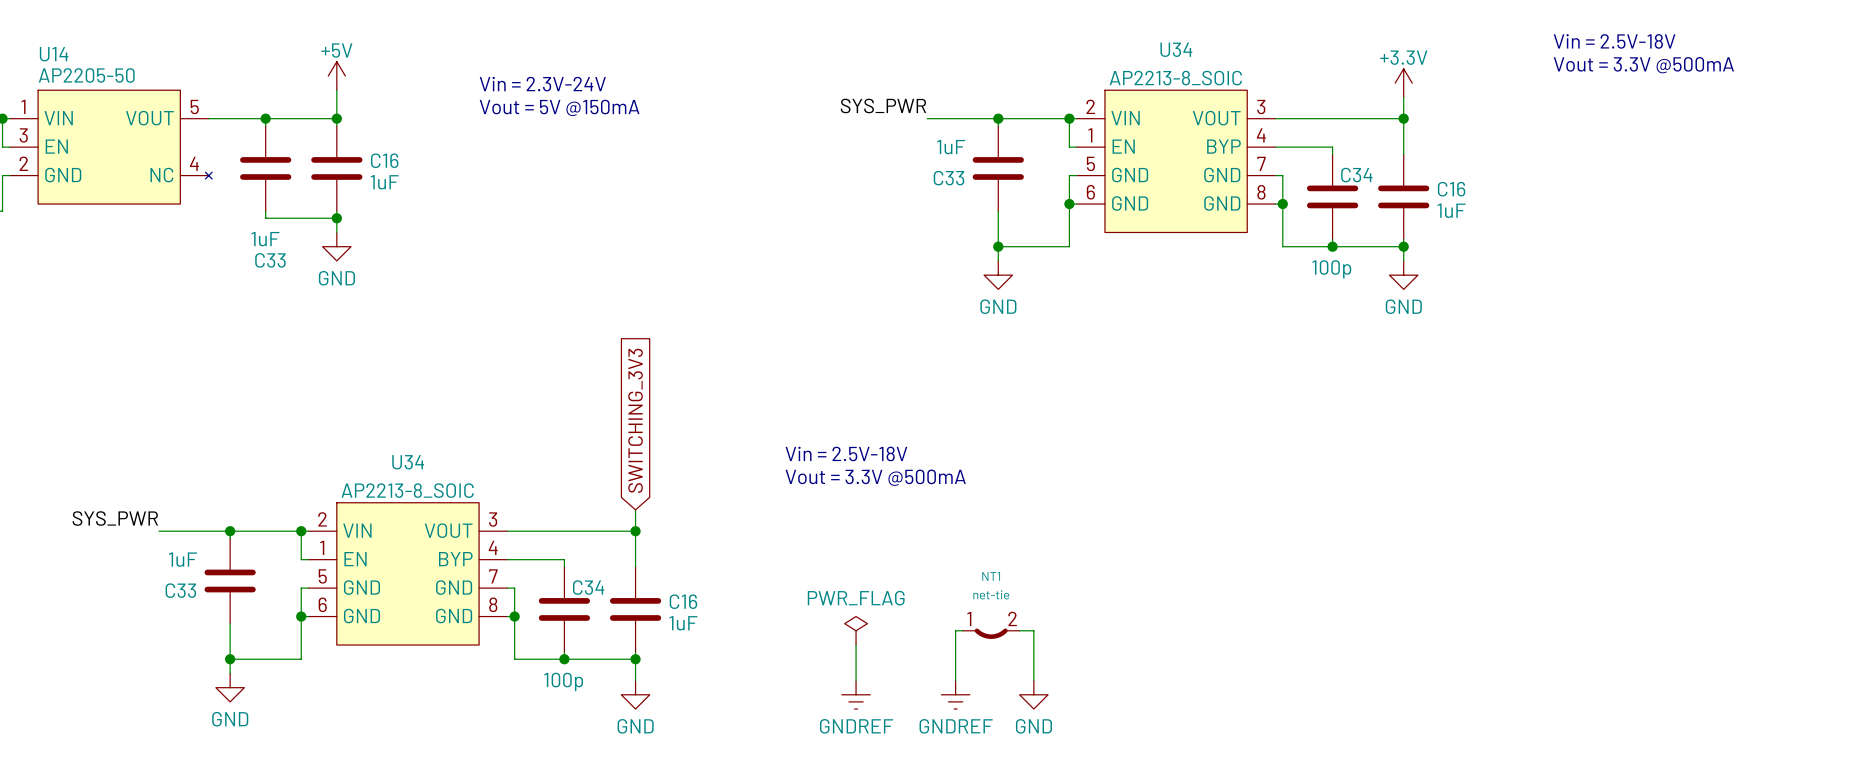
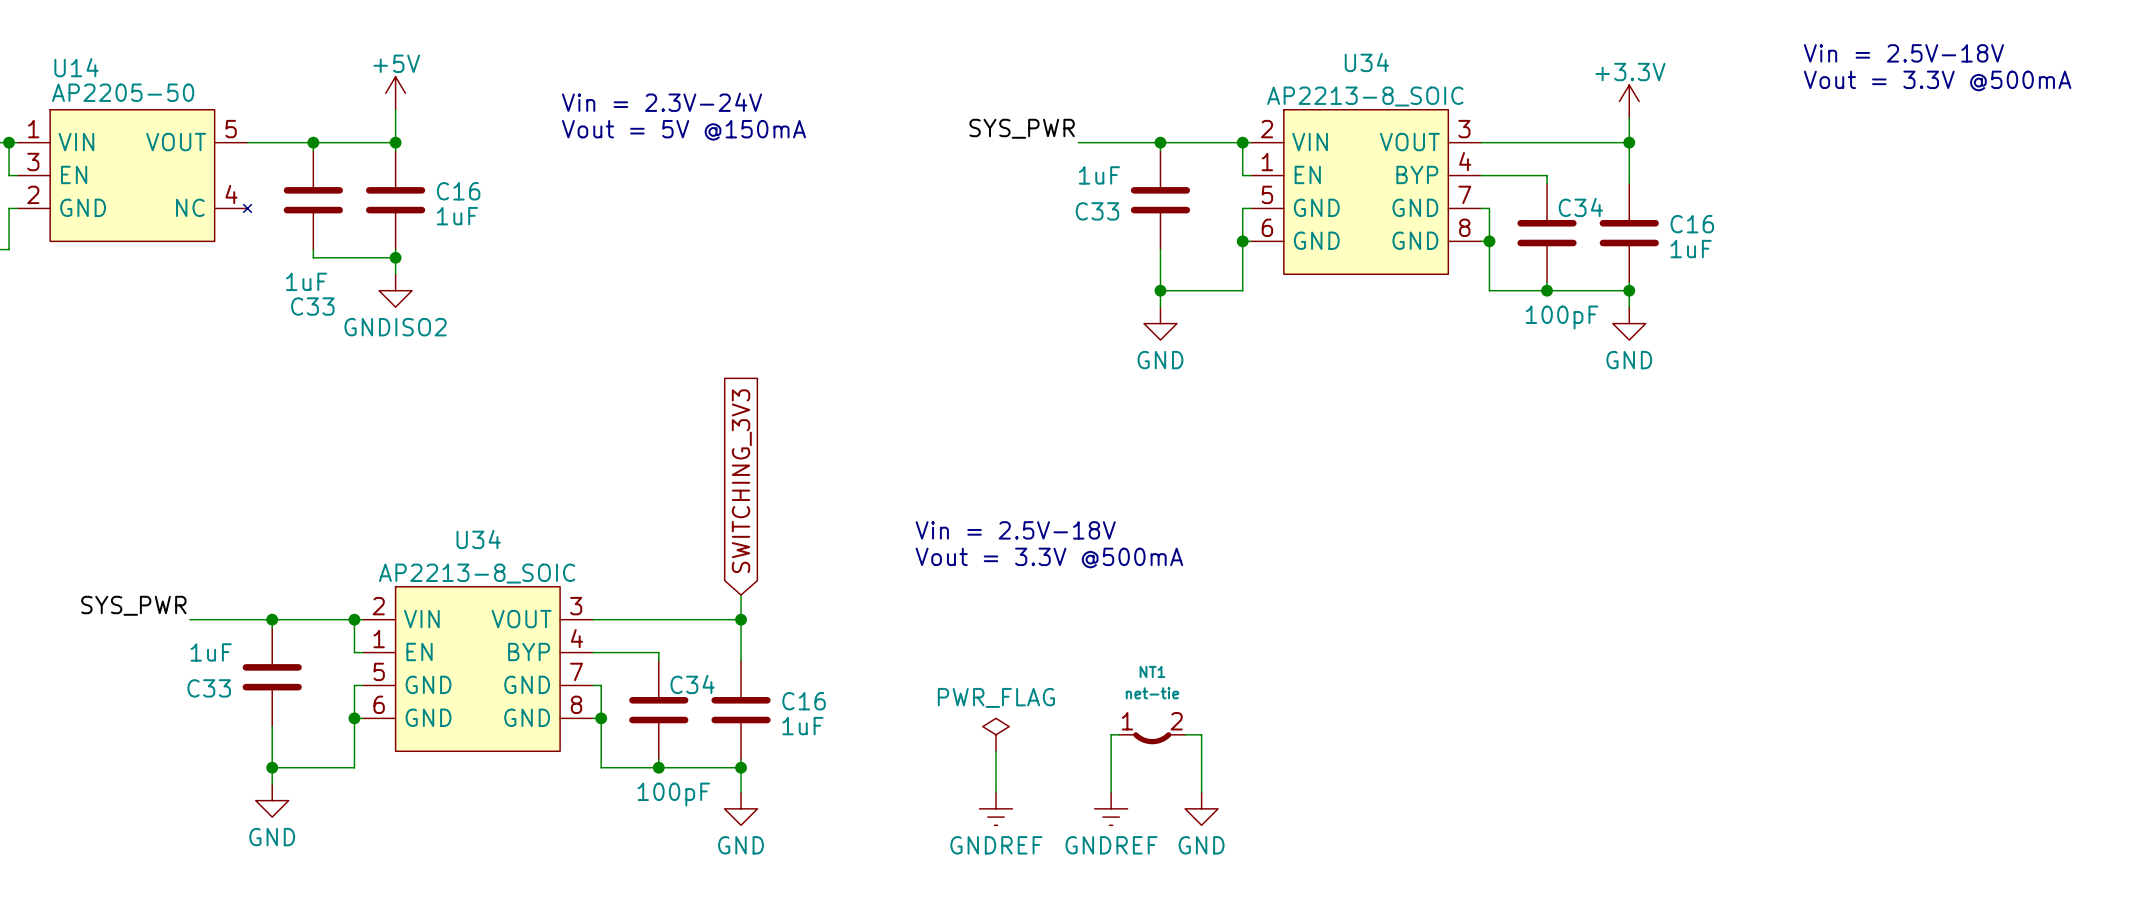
power symbol: GND (336, 246) -> GNDISO2 (395, 290)
C34 value: 100p (1331, 269) -> 100pF (1562, 317)
C34 value: 100p (563, 681) -> 100pF (673, 794)

